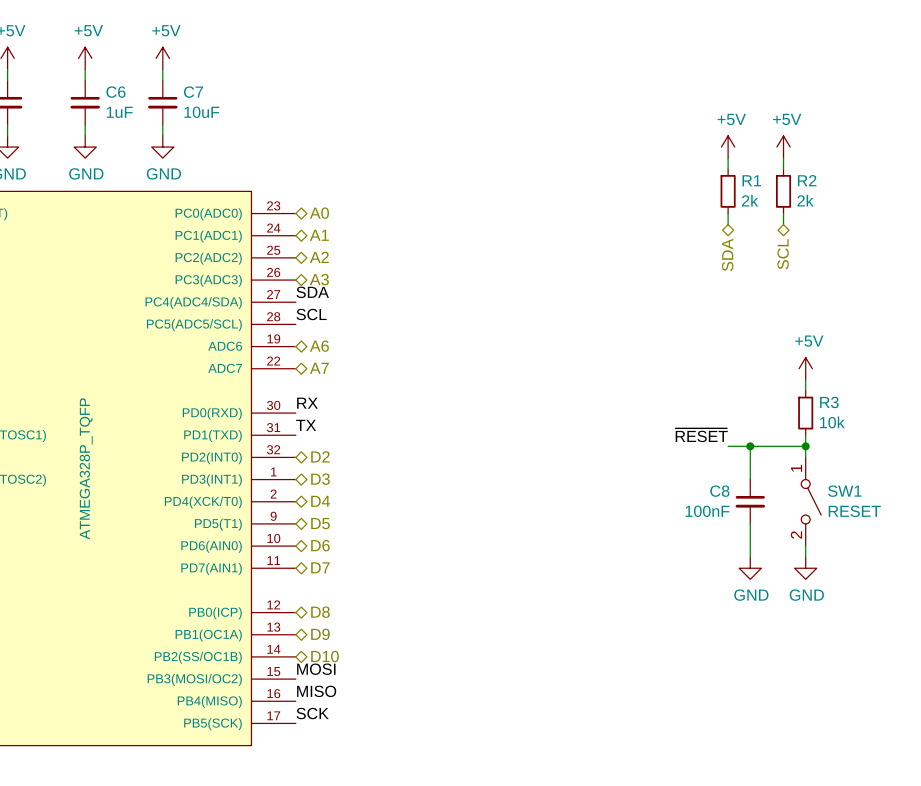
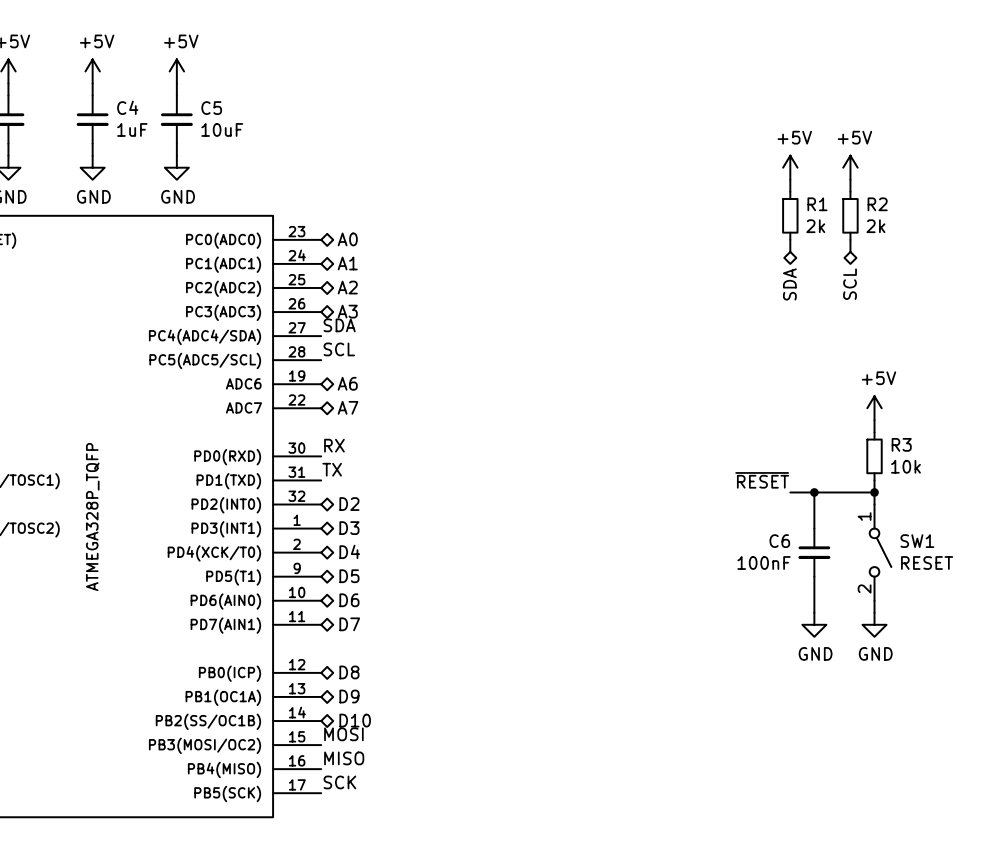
C6 name: C6 (115, 92) -> C4 (127, 107)
C7 name: C7 (193, 92) -> C5 (211, 108)
C8 name: C8 (719, 491) -> C6 (779, 541)

